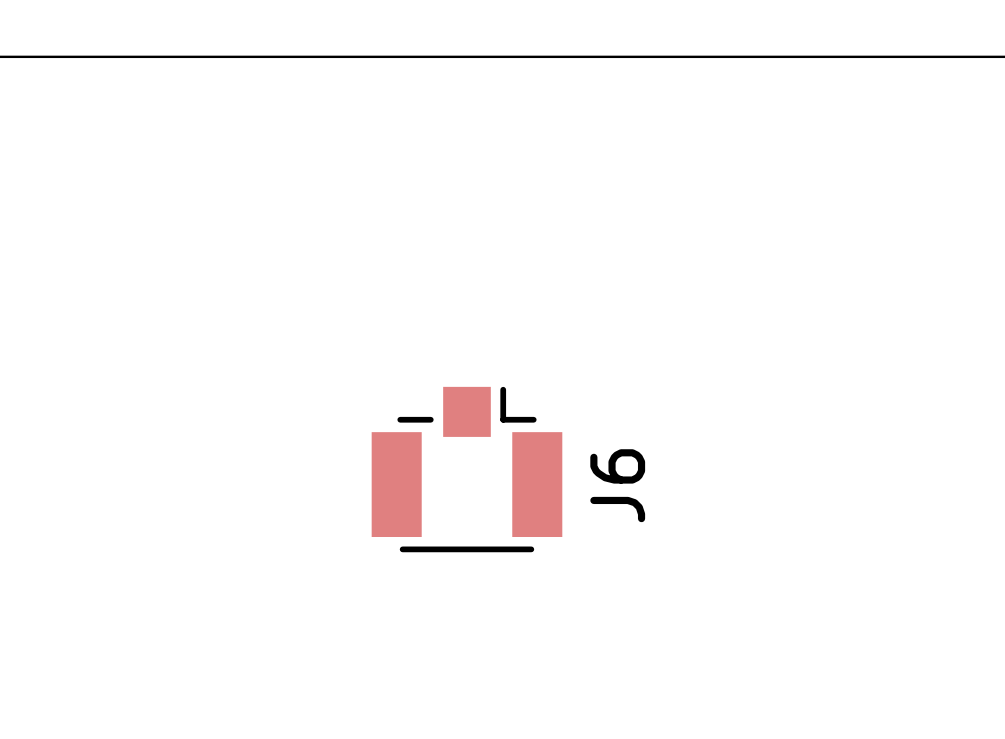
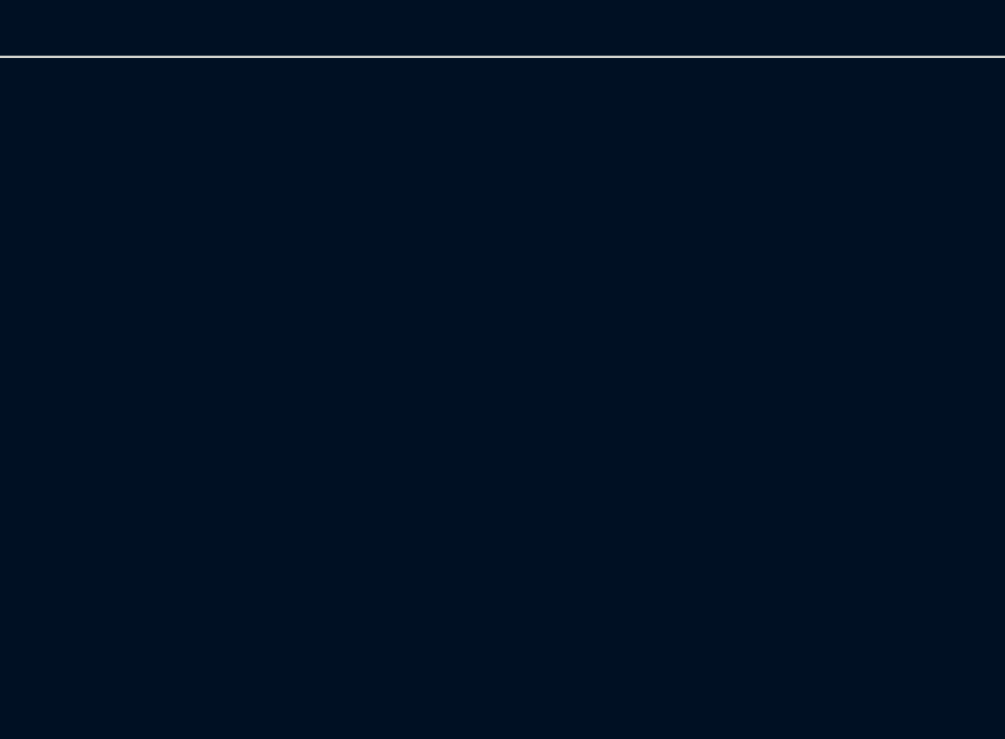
J6: (466, 469) -> none

